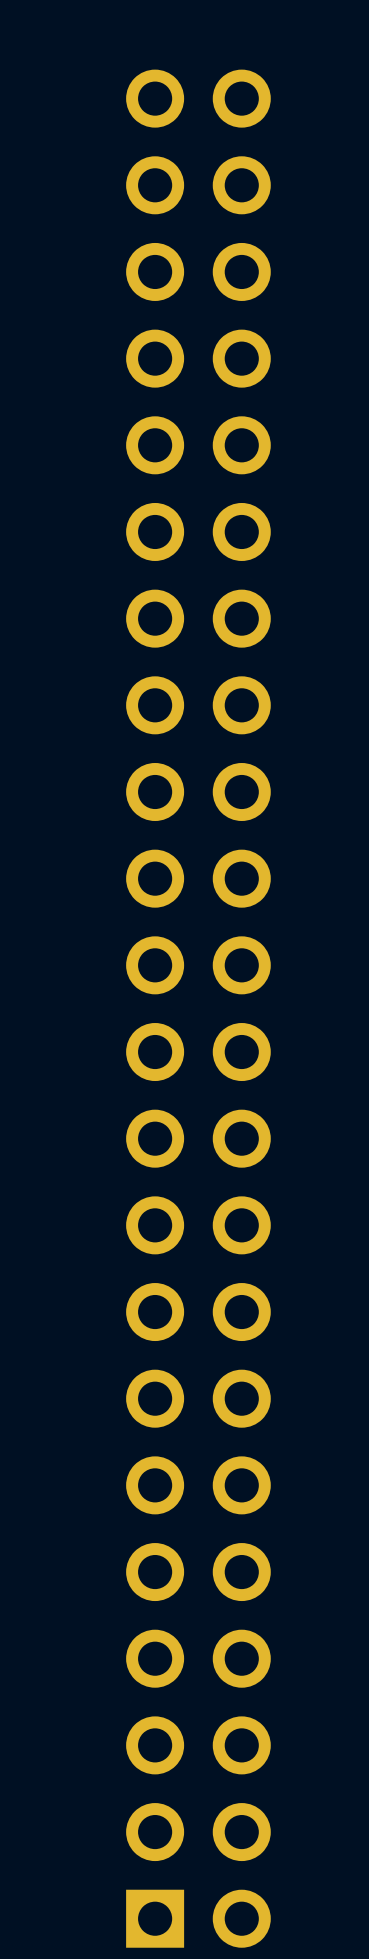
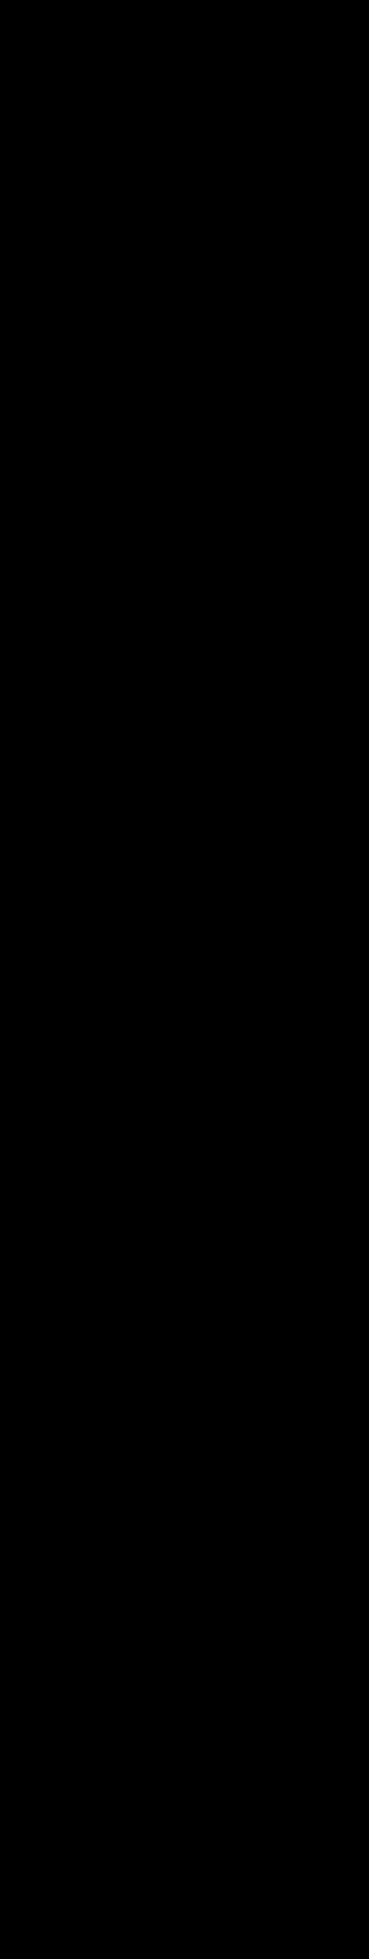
part: (198, 1008) -> none

